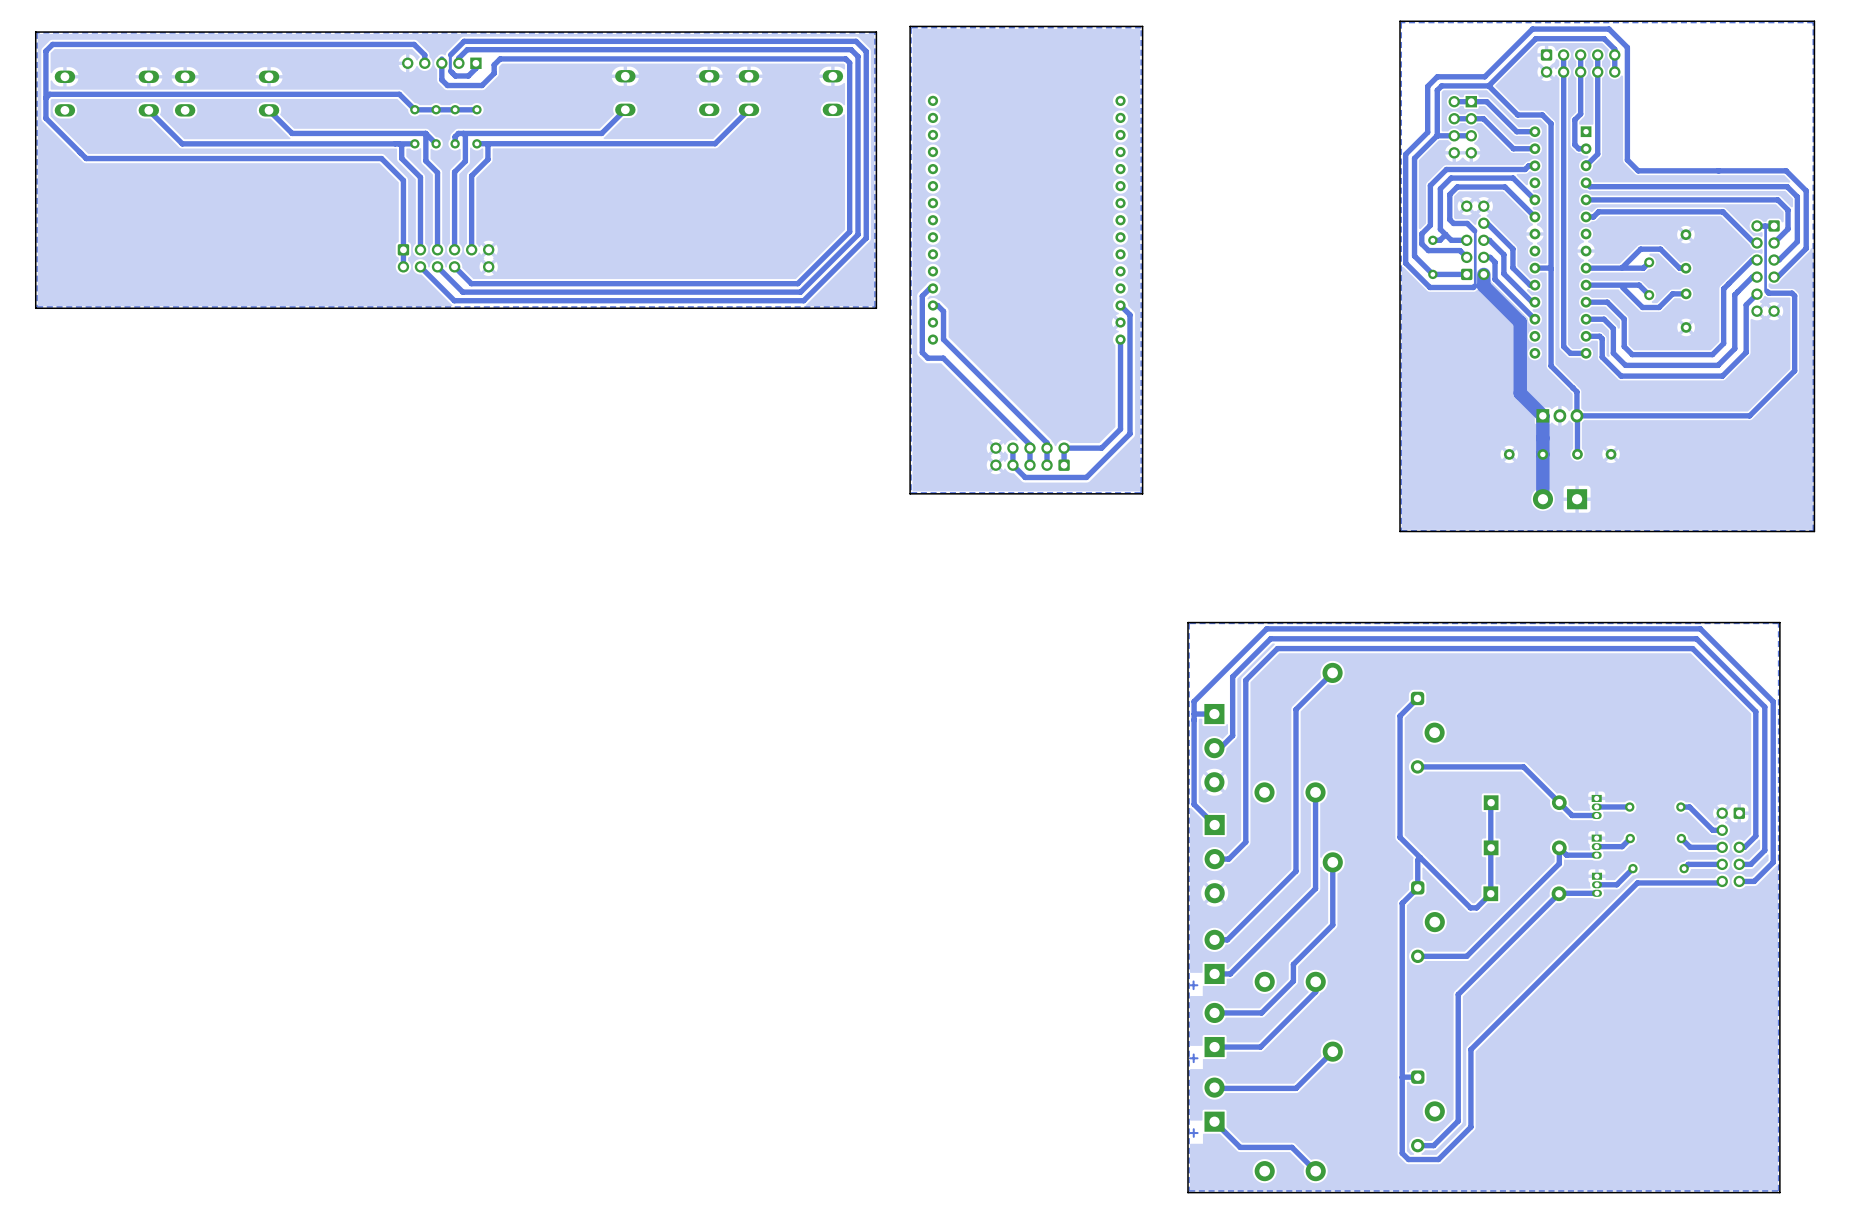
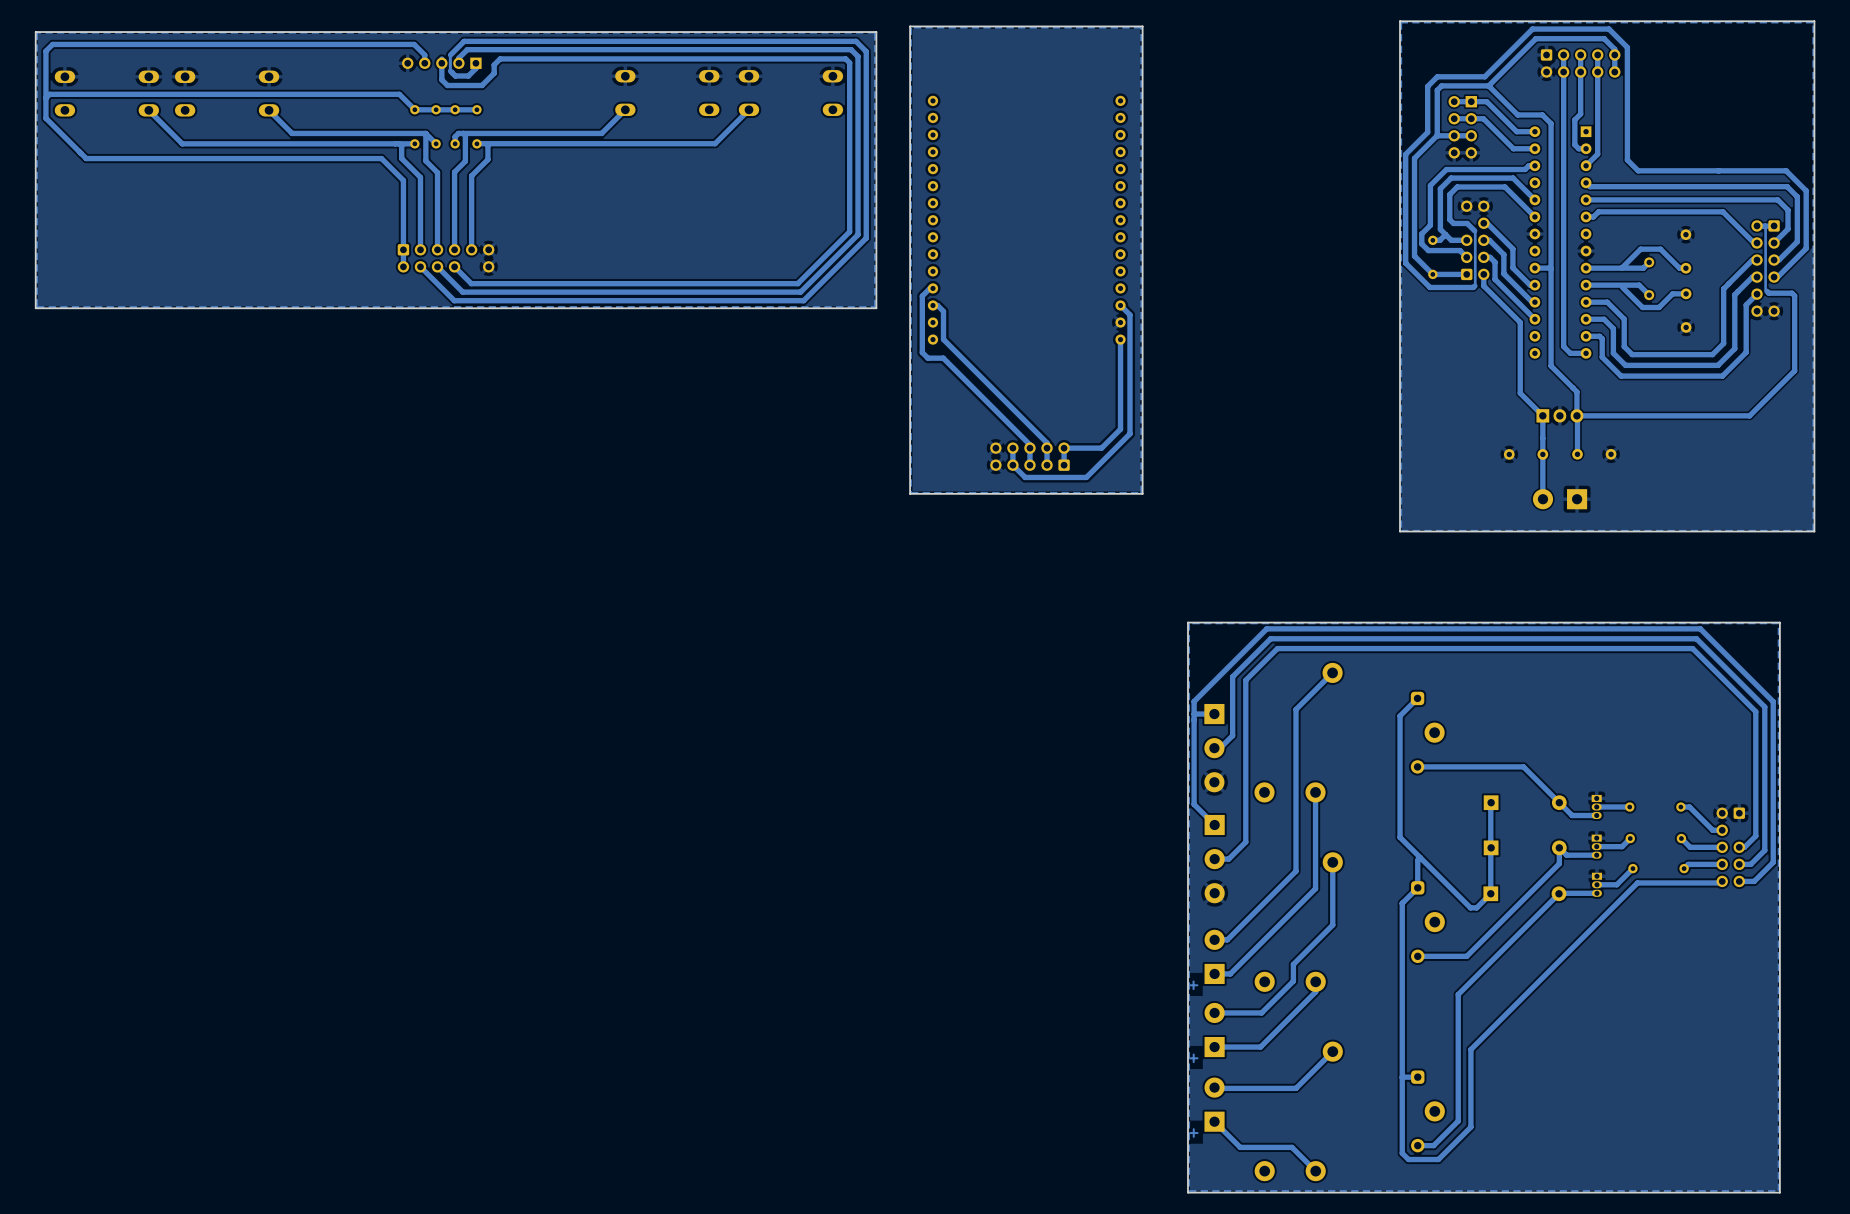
bottom track width: thick (1483, 274) (1483, 286) (1520, 322) (1520, 393) (1542, 415) (1542, 499) -> thin (1483, 274) (1483, 286) (1520, 322) (1520, 393) (1542, 415) (1542, 499)

